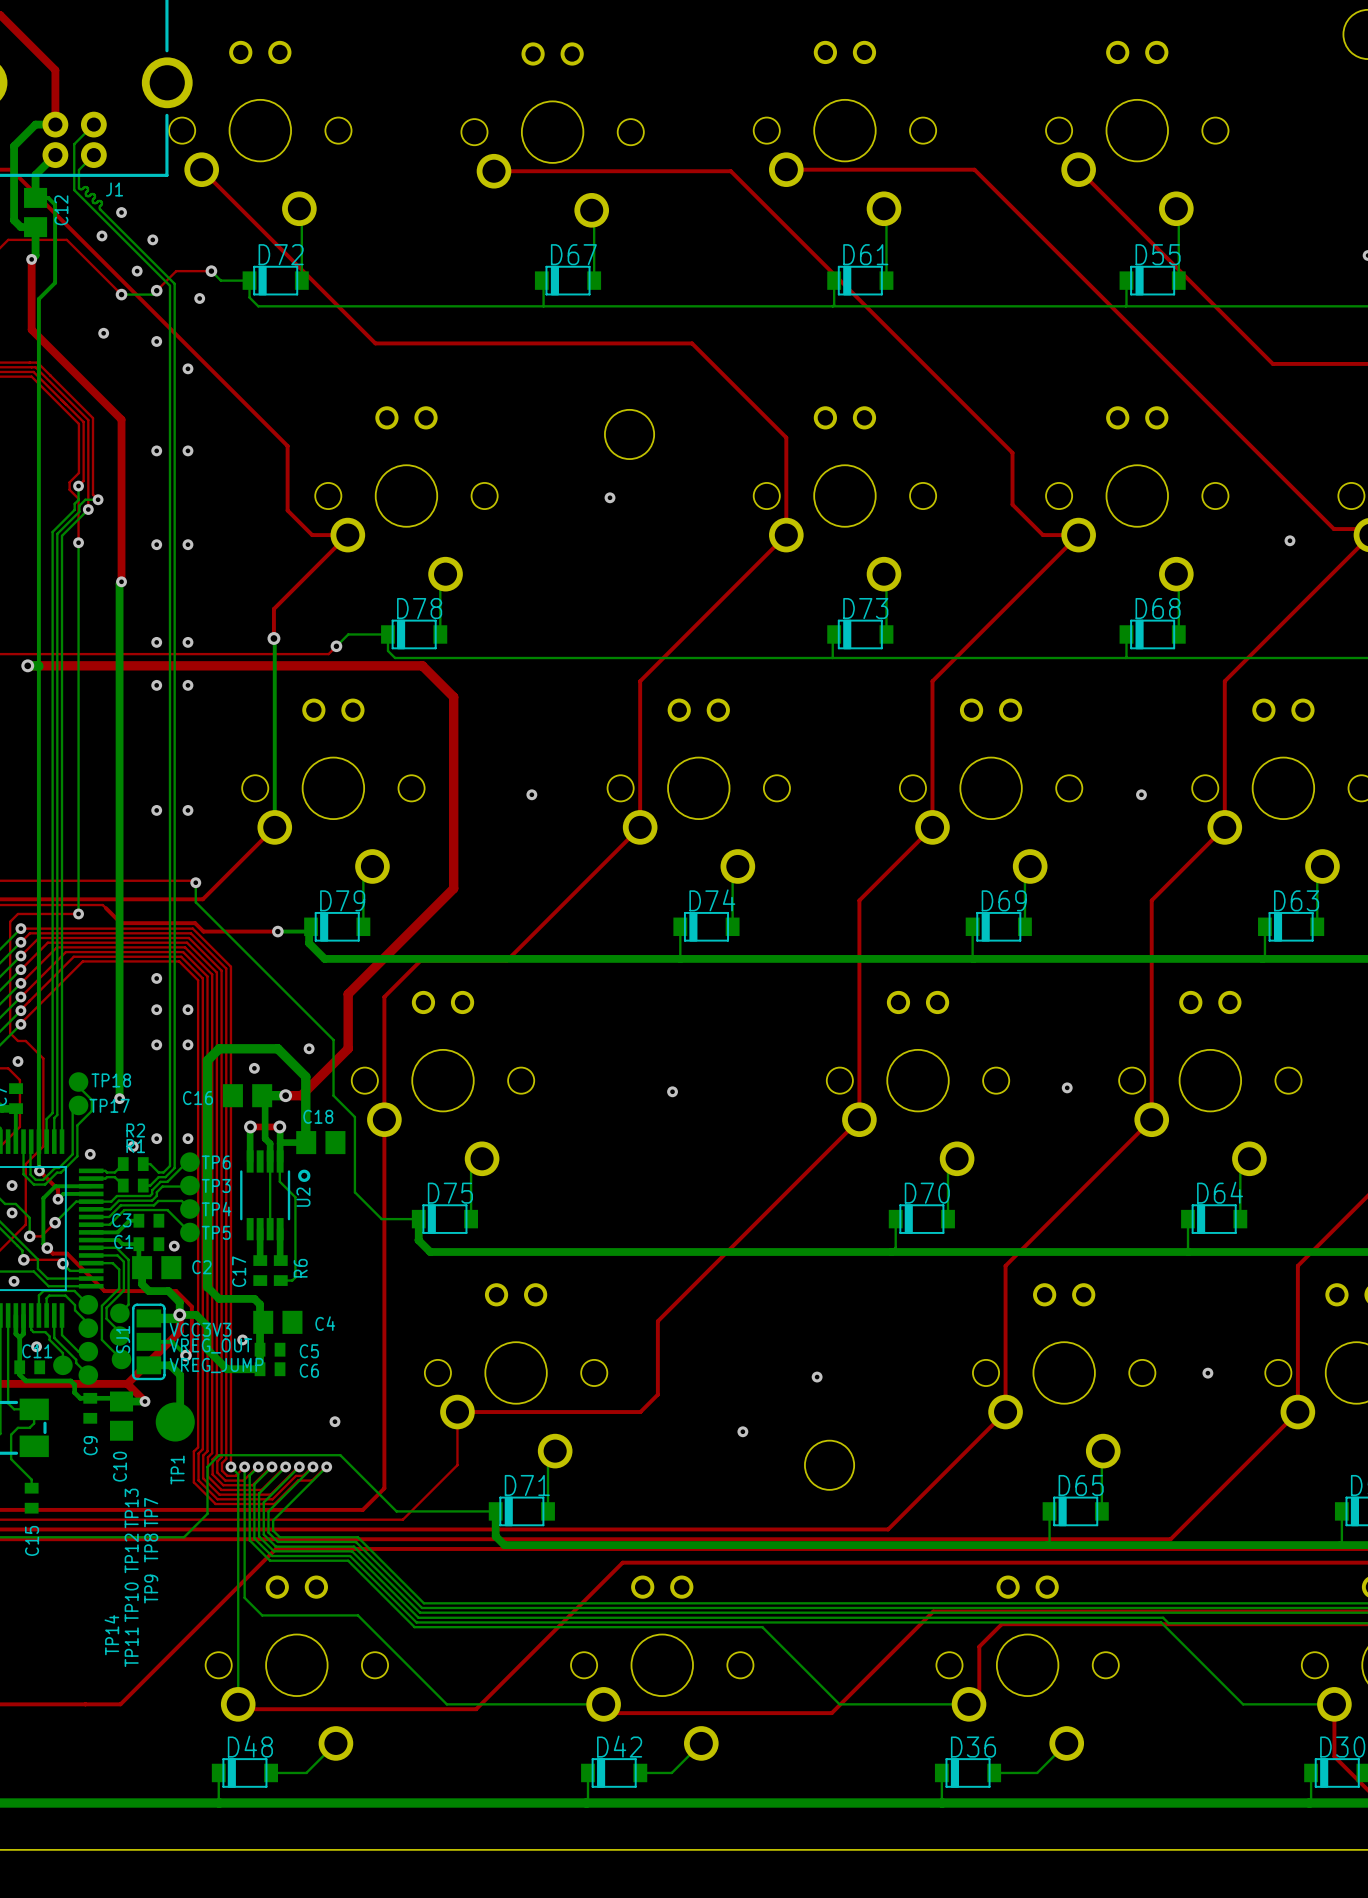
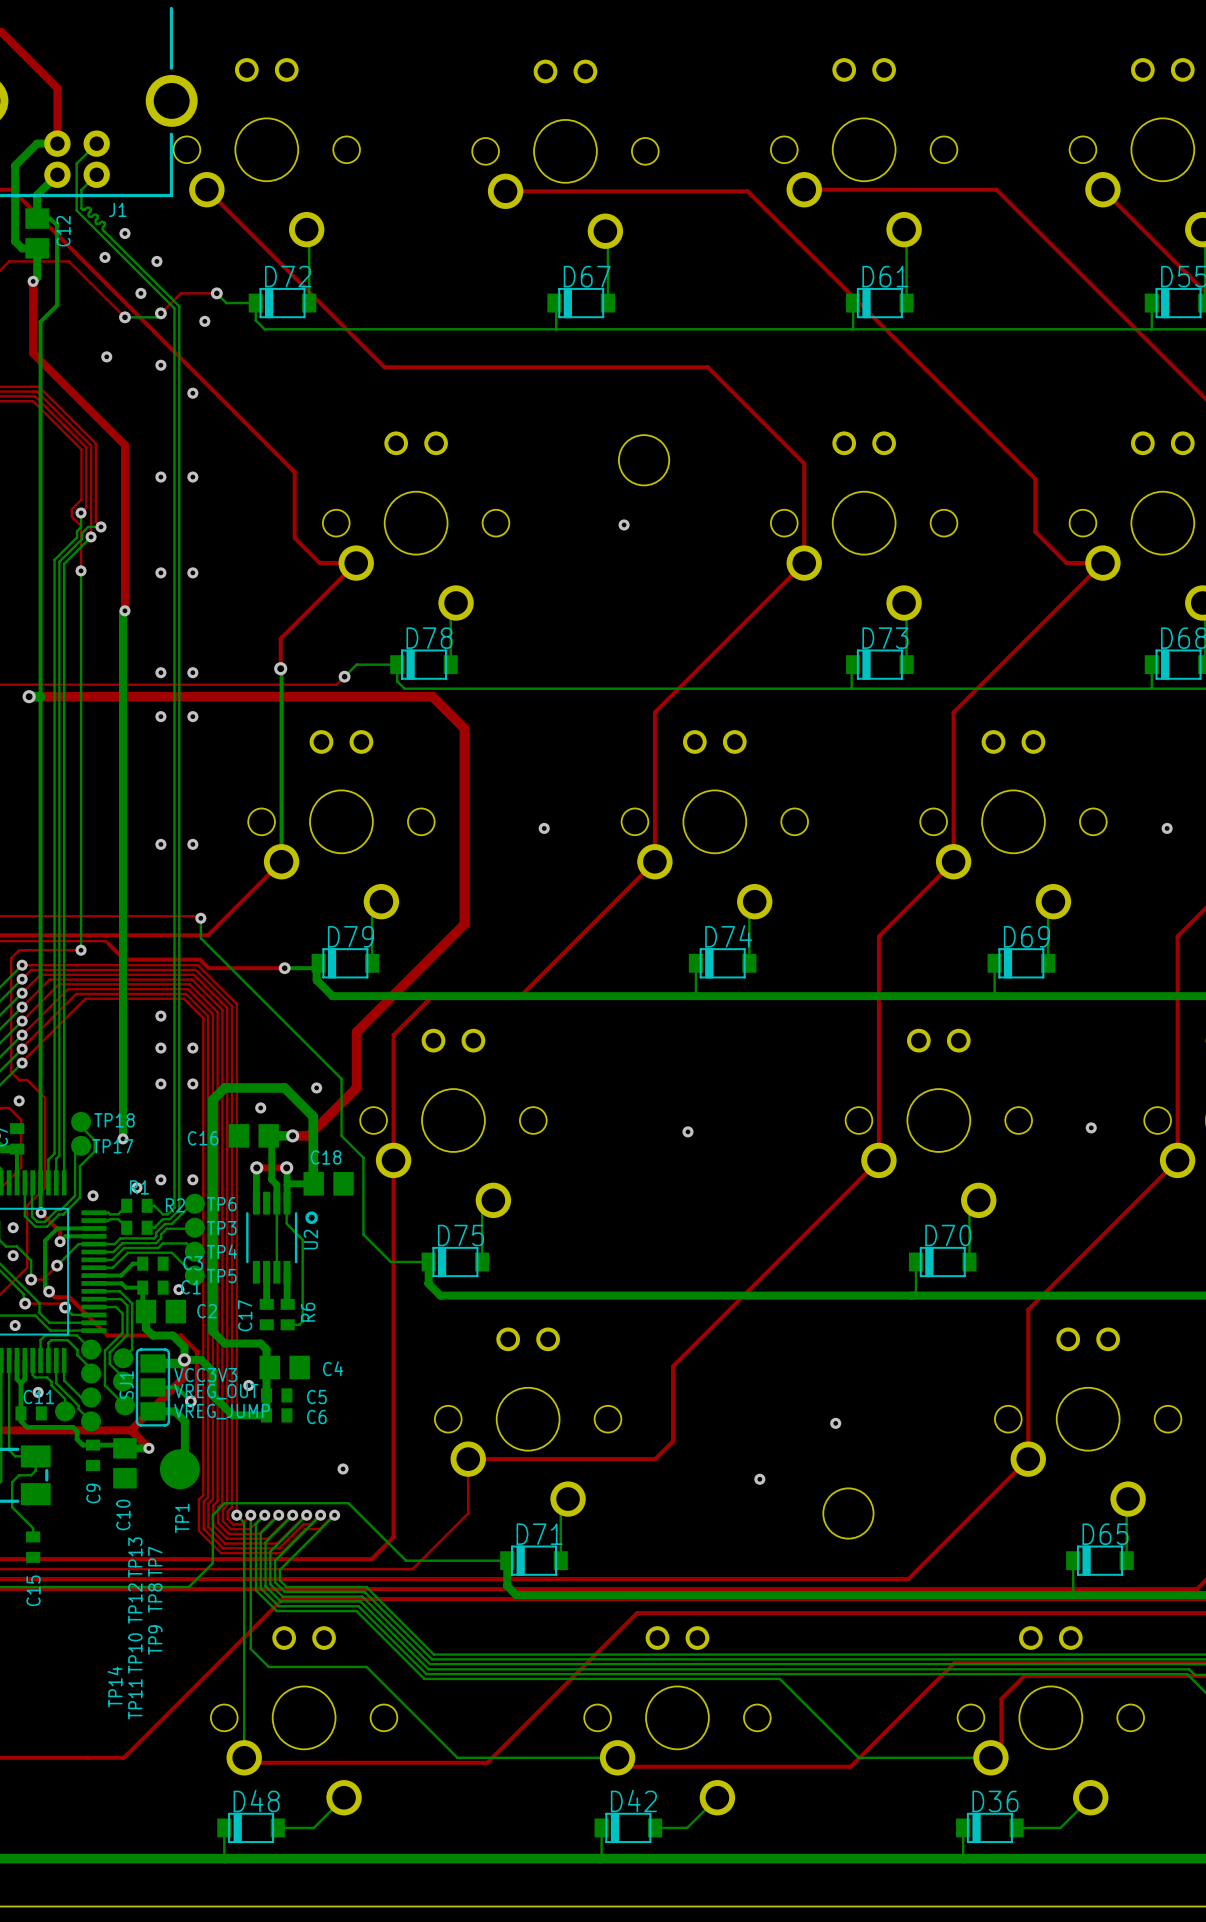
R2 name position: R2 (135, 1130) -> R2 (175, 1205)
C3 name position: C3 (121, 1220) -> C3 (193, 1263)
C1 name position: C1 (123, 1241) -> C1 (191, 1287)

